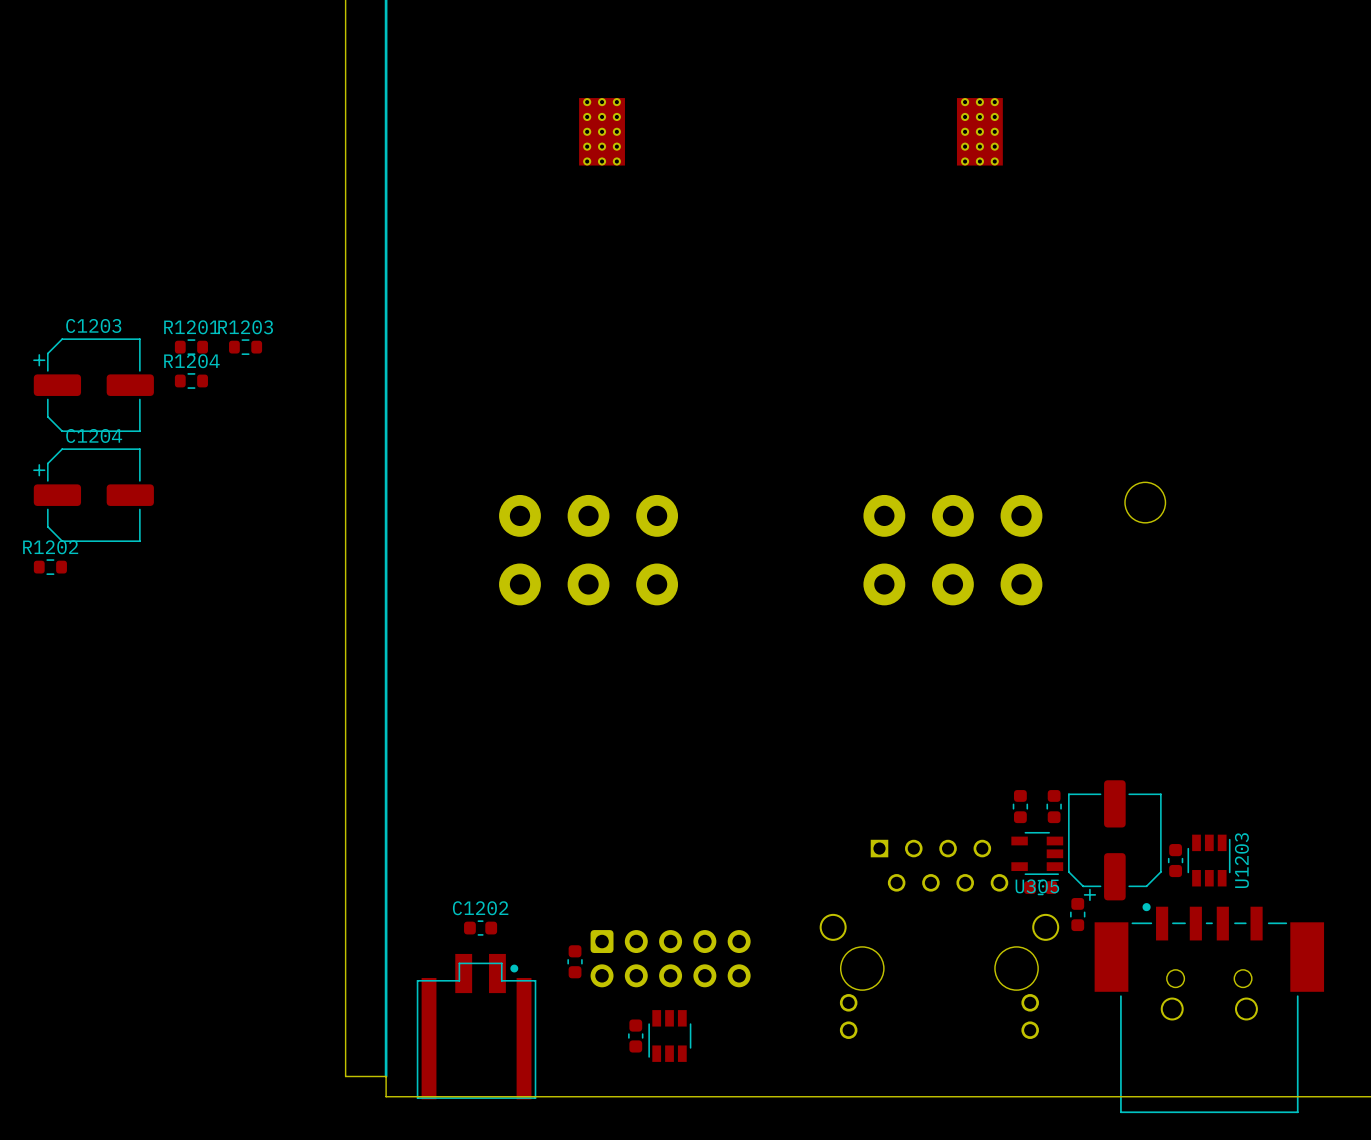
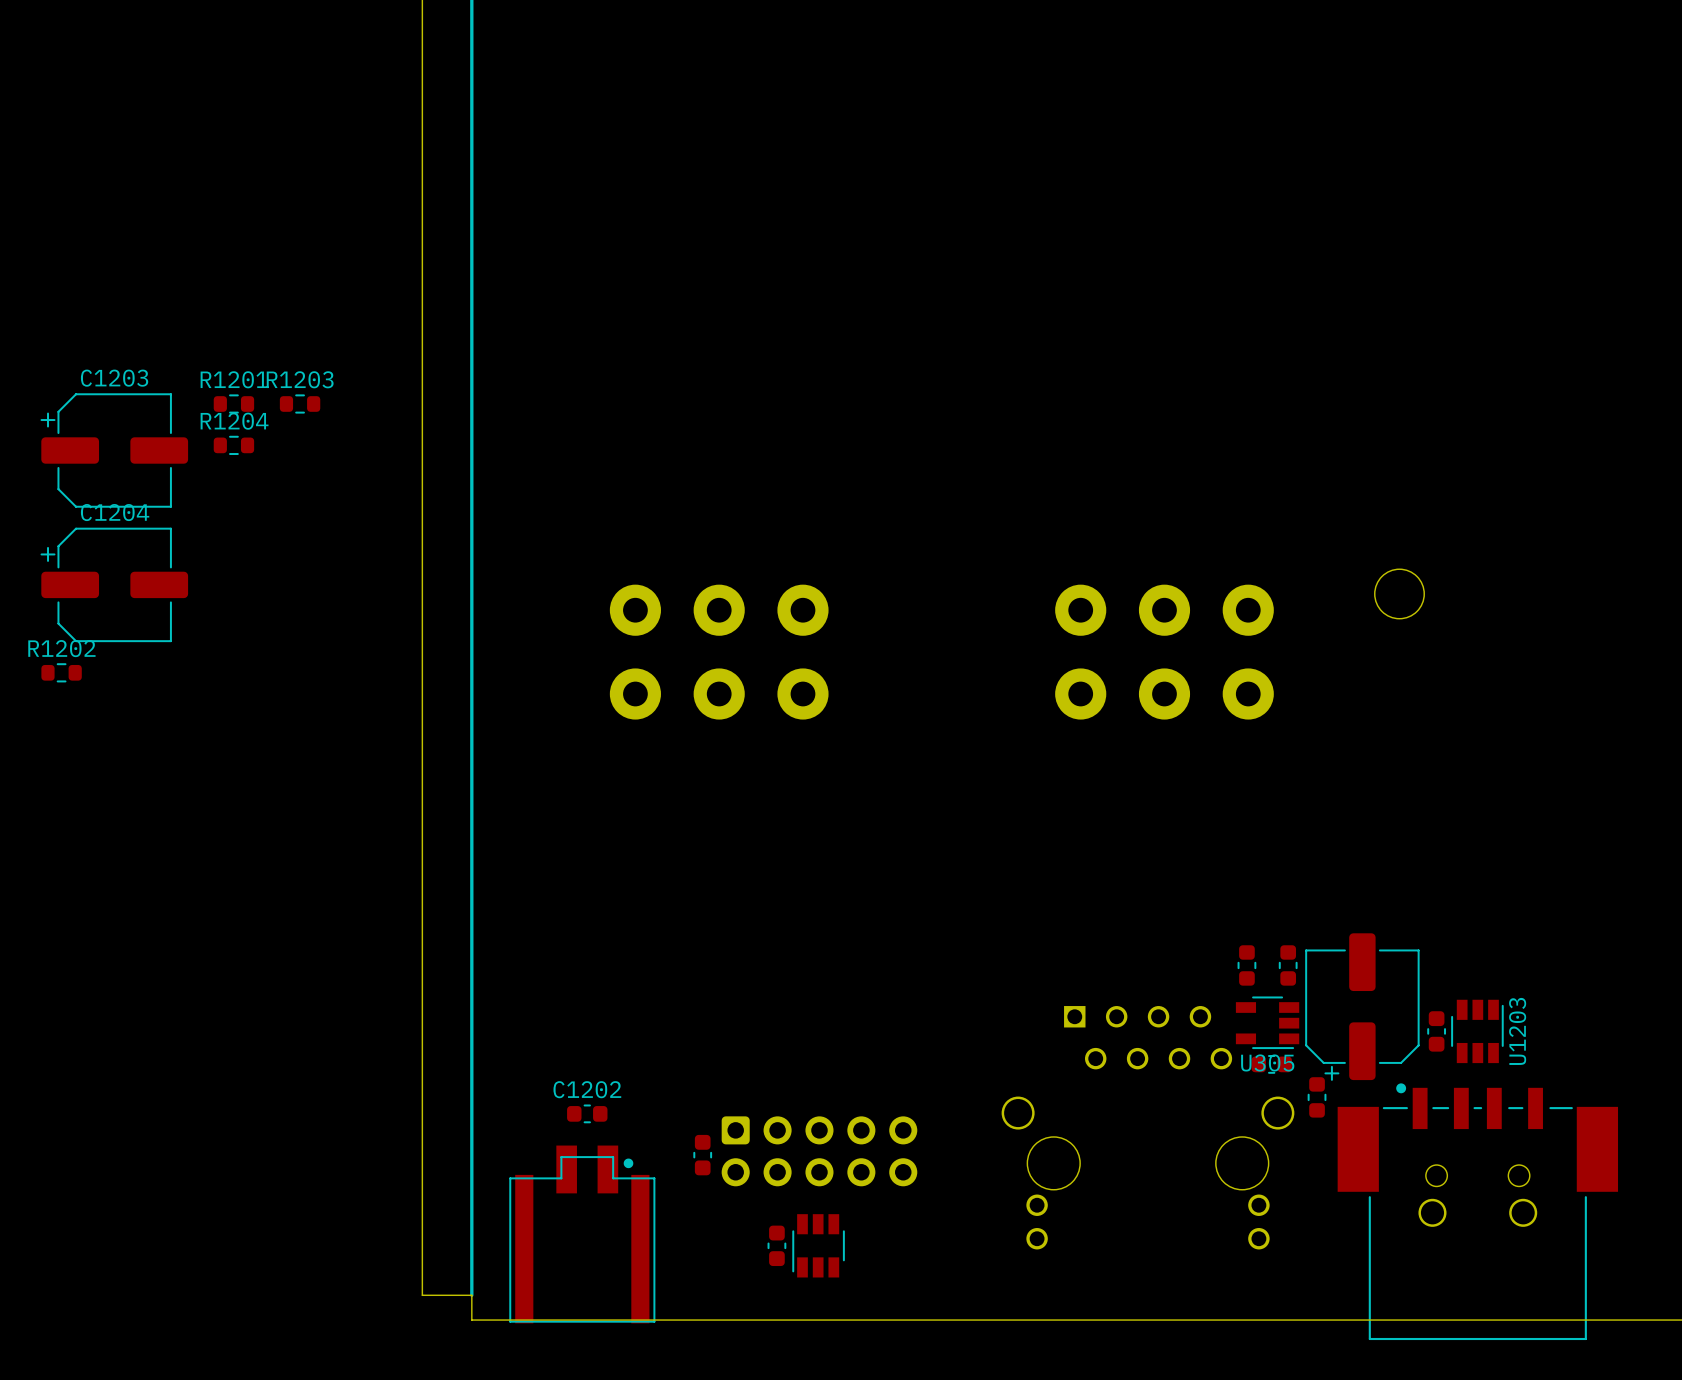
part: (602, 131) -> none
part: (979, 131) -> none

